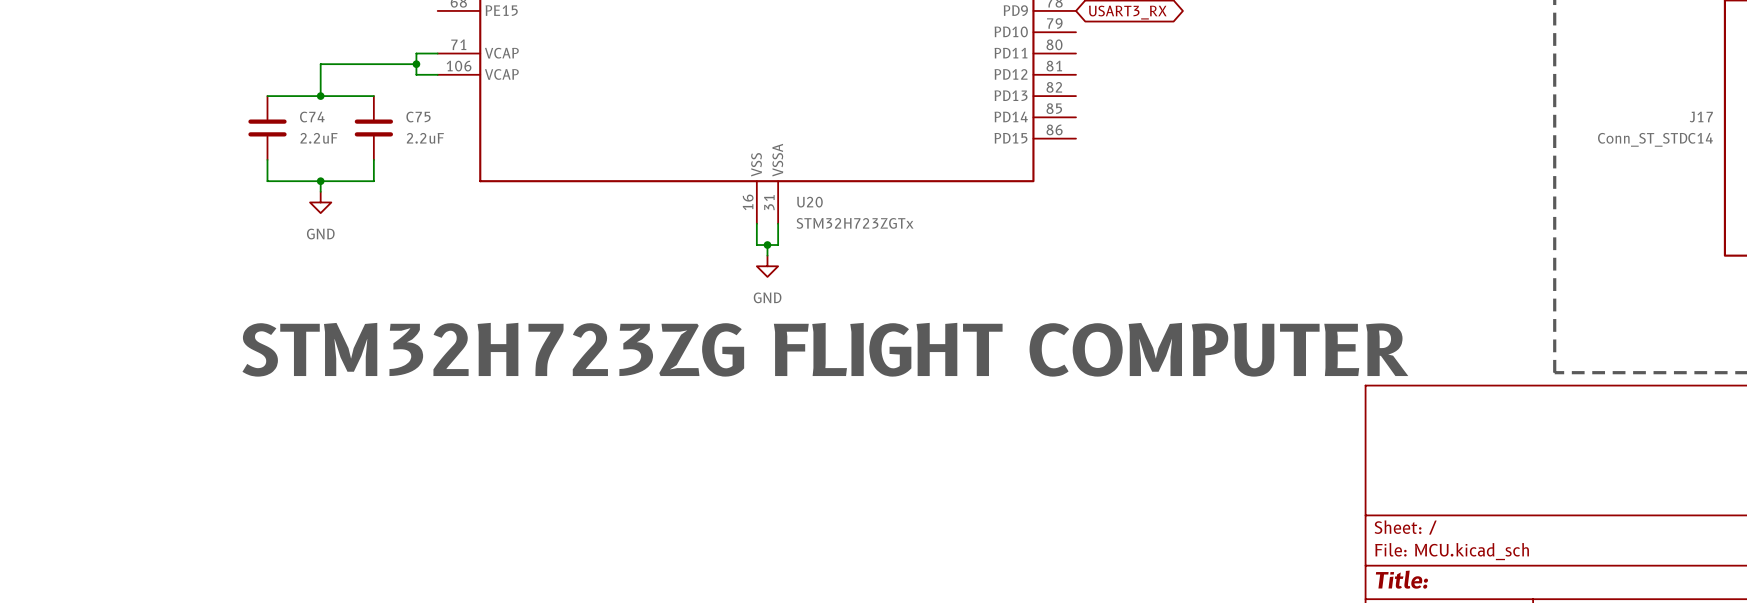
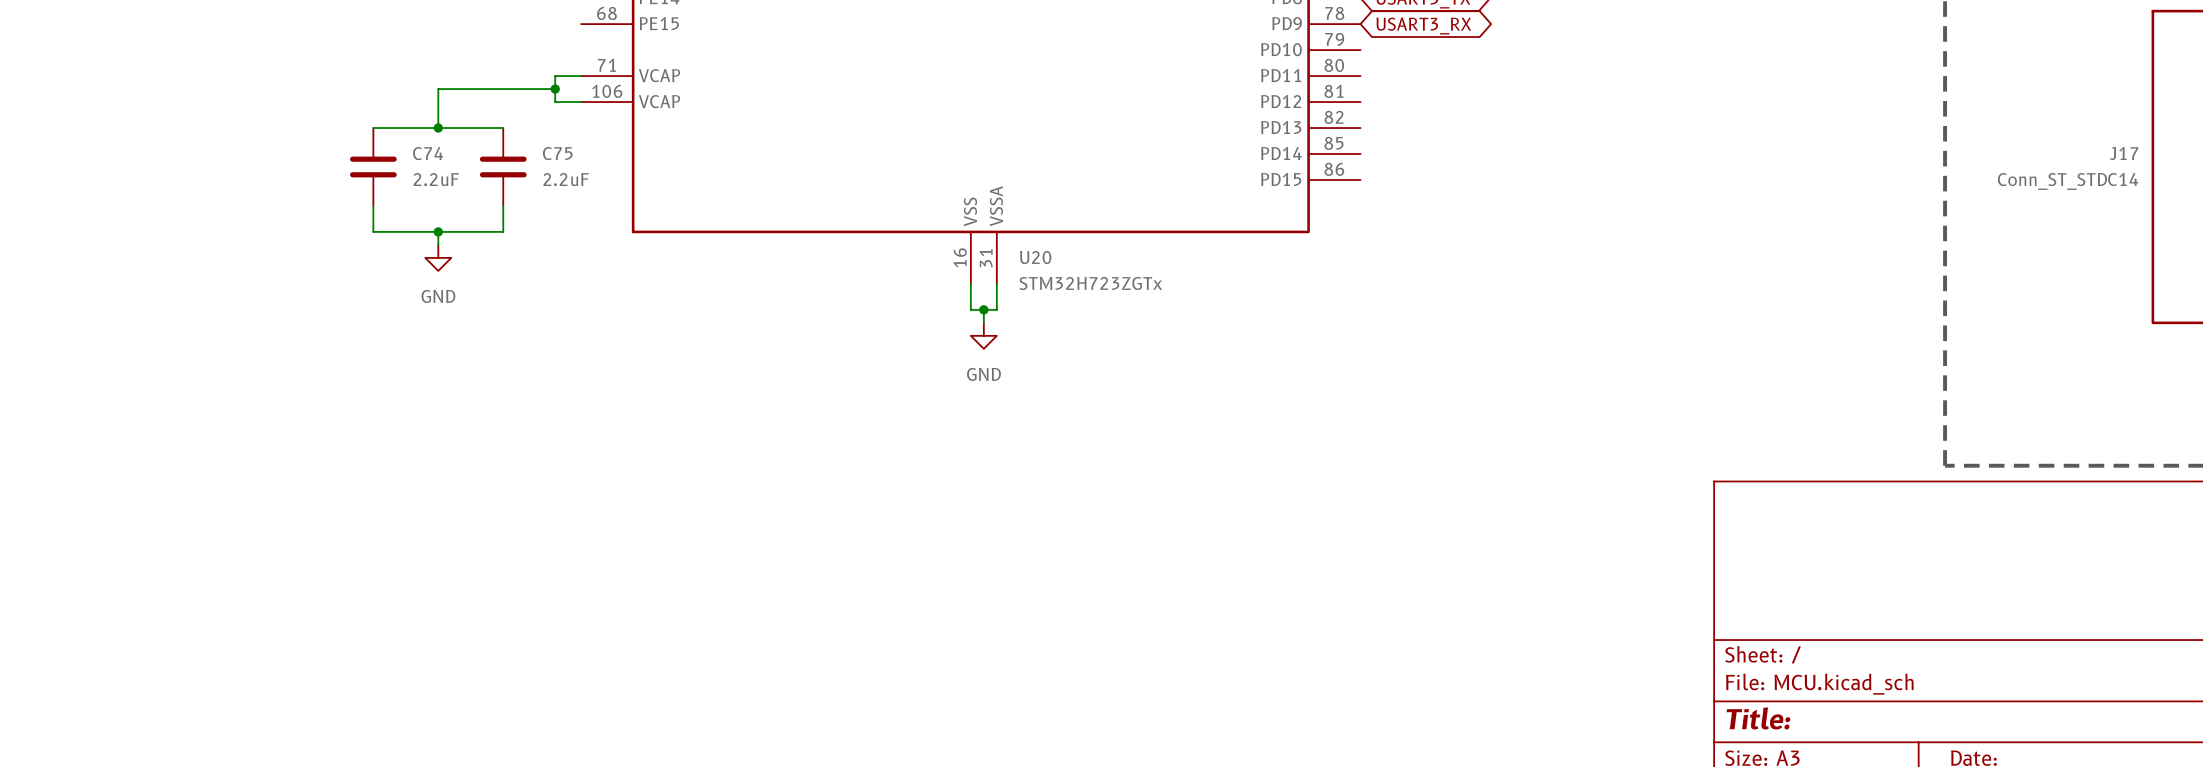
text: STM32H723ZG FLIGHT COMPUTER (825, 349) -> none

